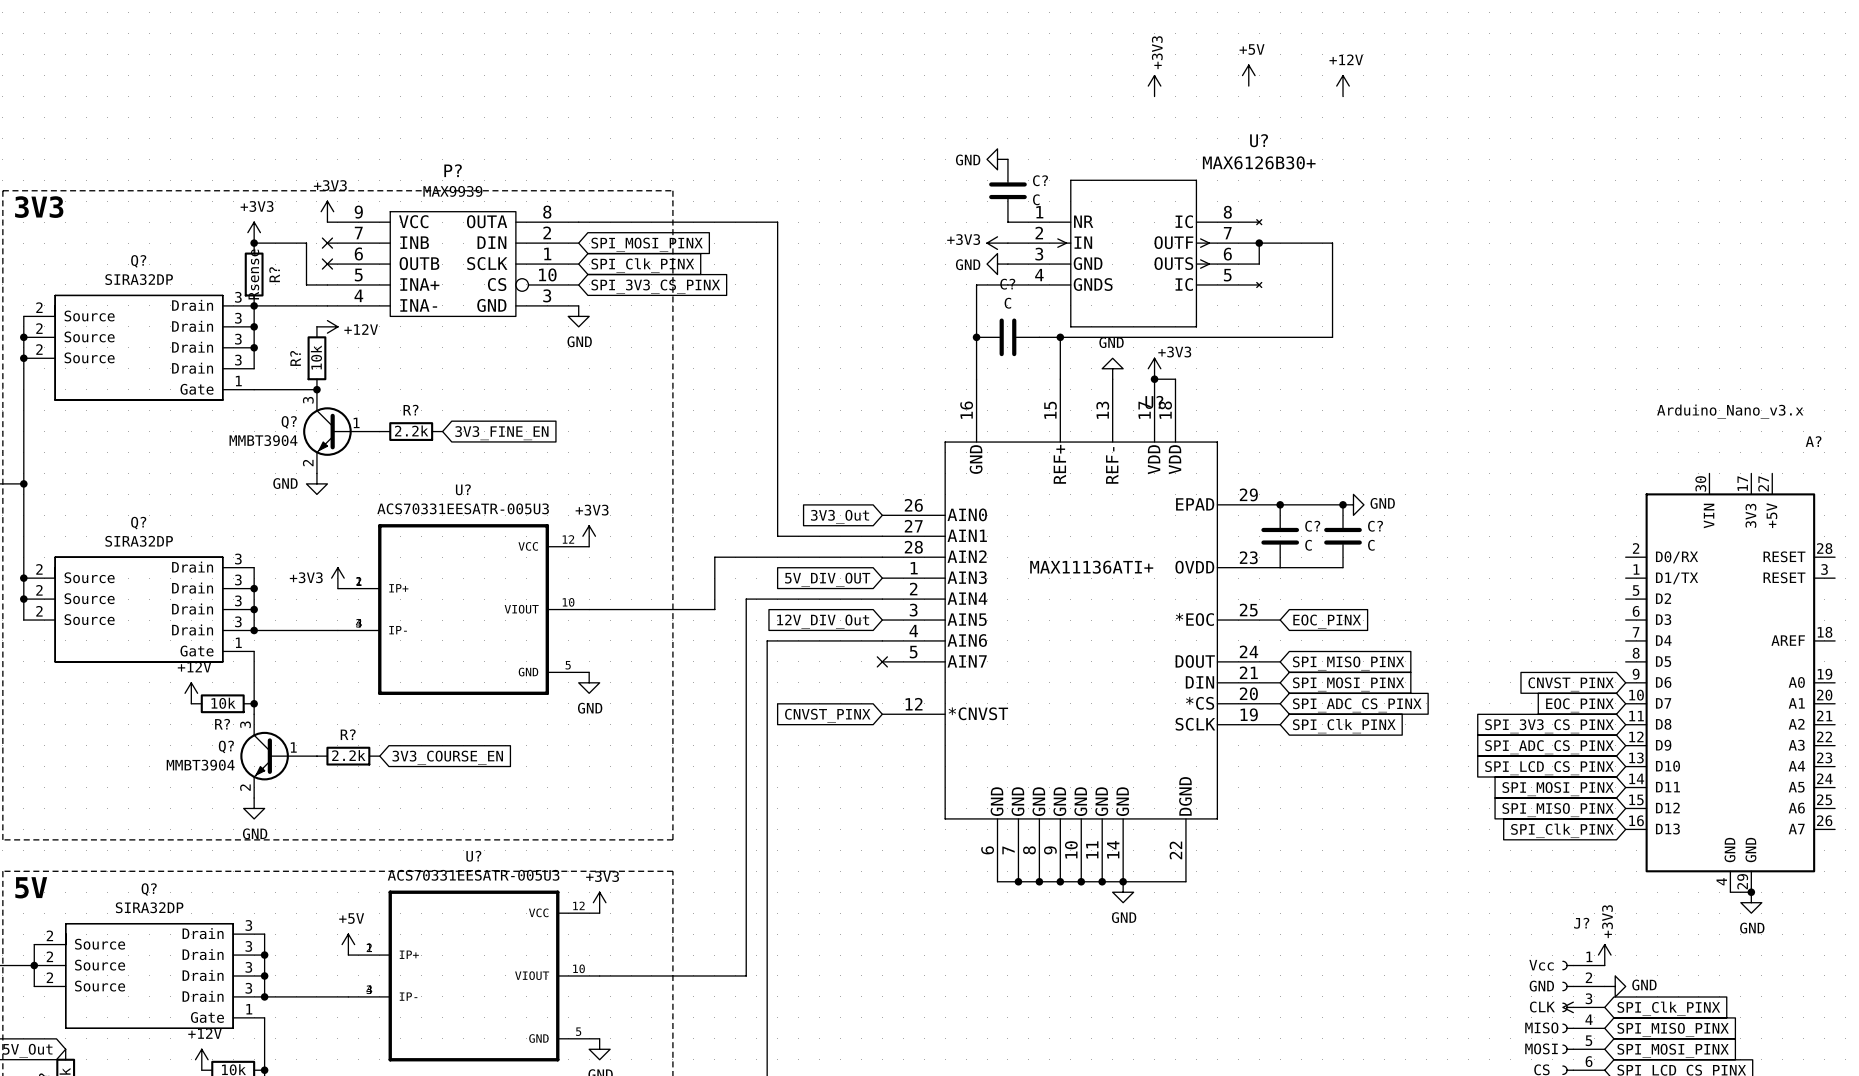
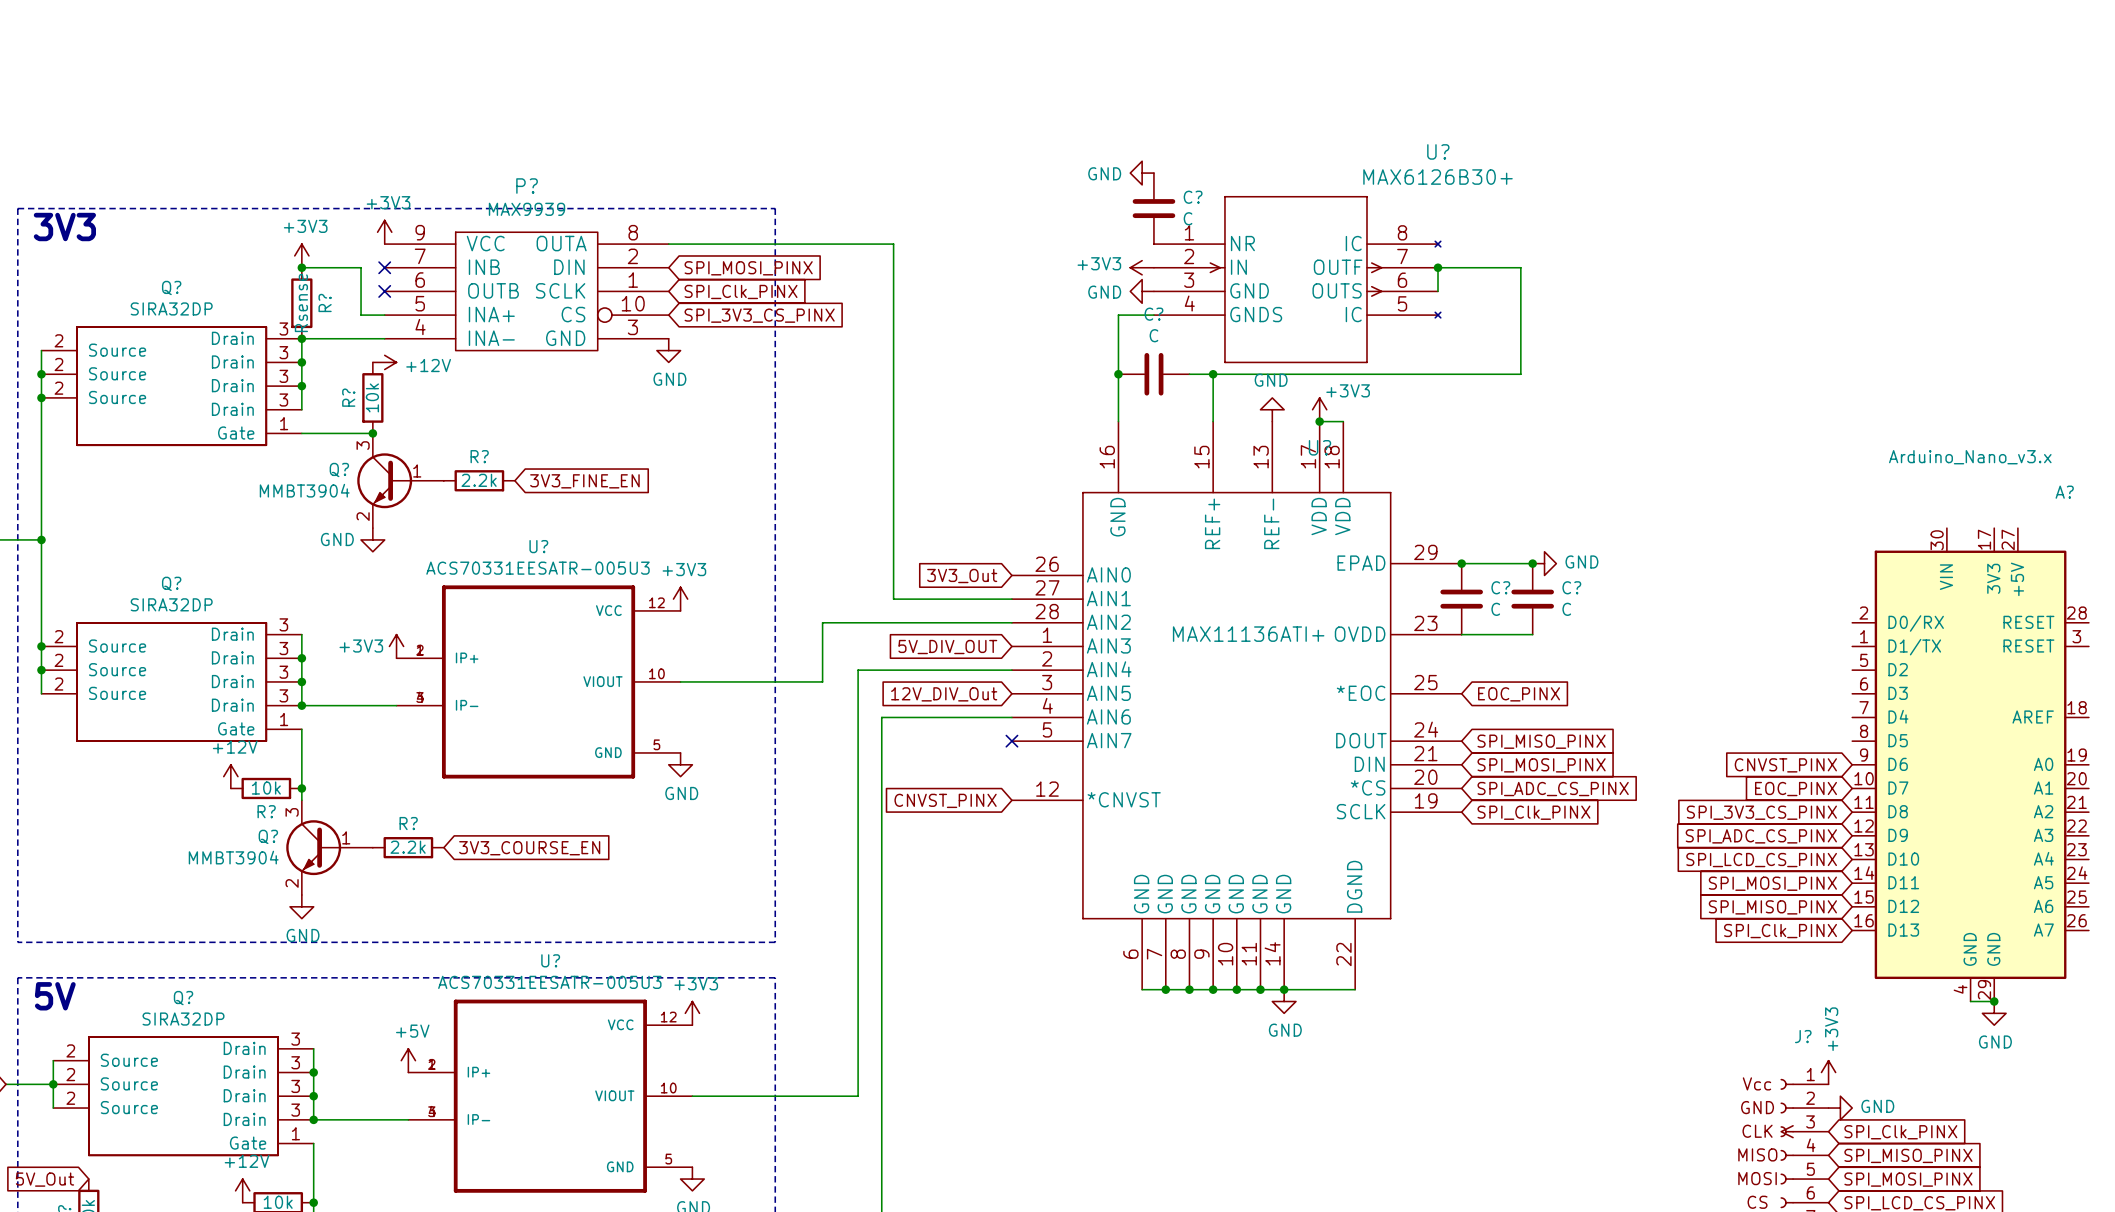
power symbol: +5V (1248, 75) -> none
power symbol: +3V3 (1154, 86) -> none
power symbol: +12V (1343, 86) -> none

